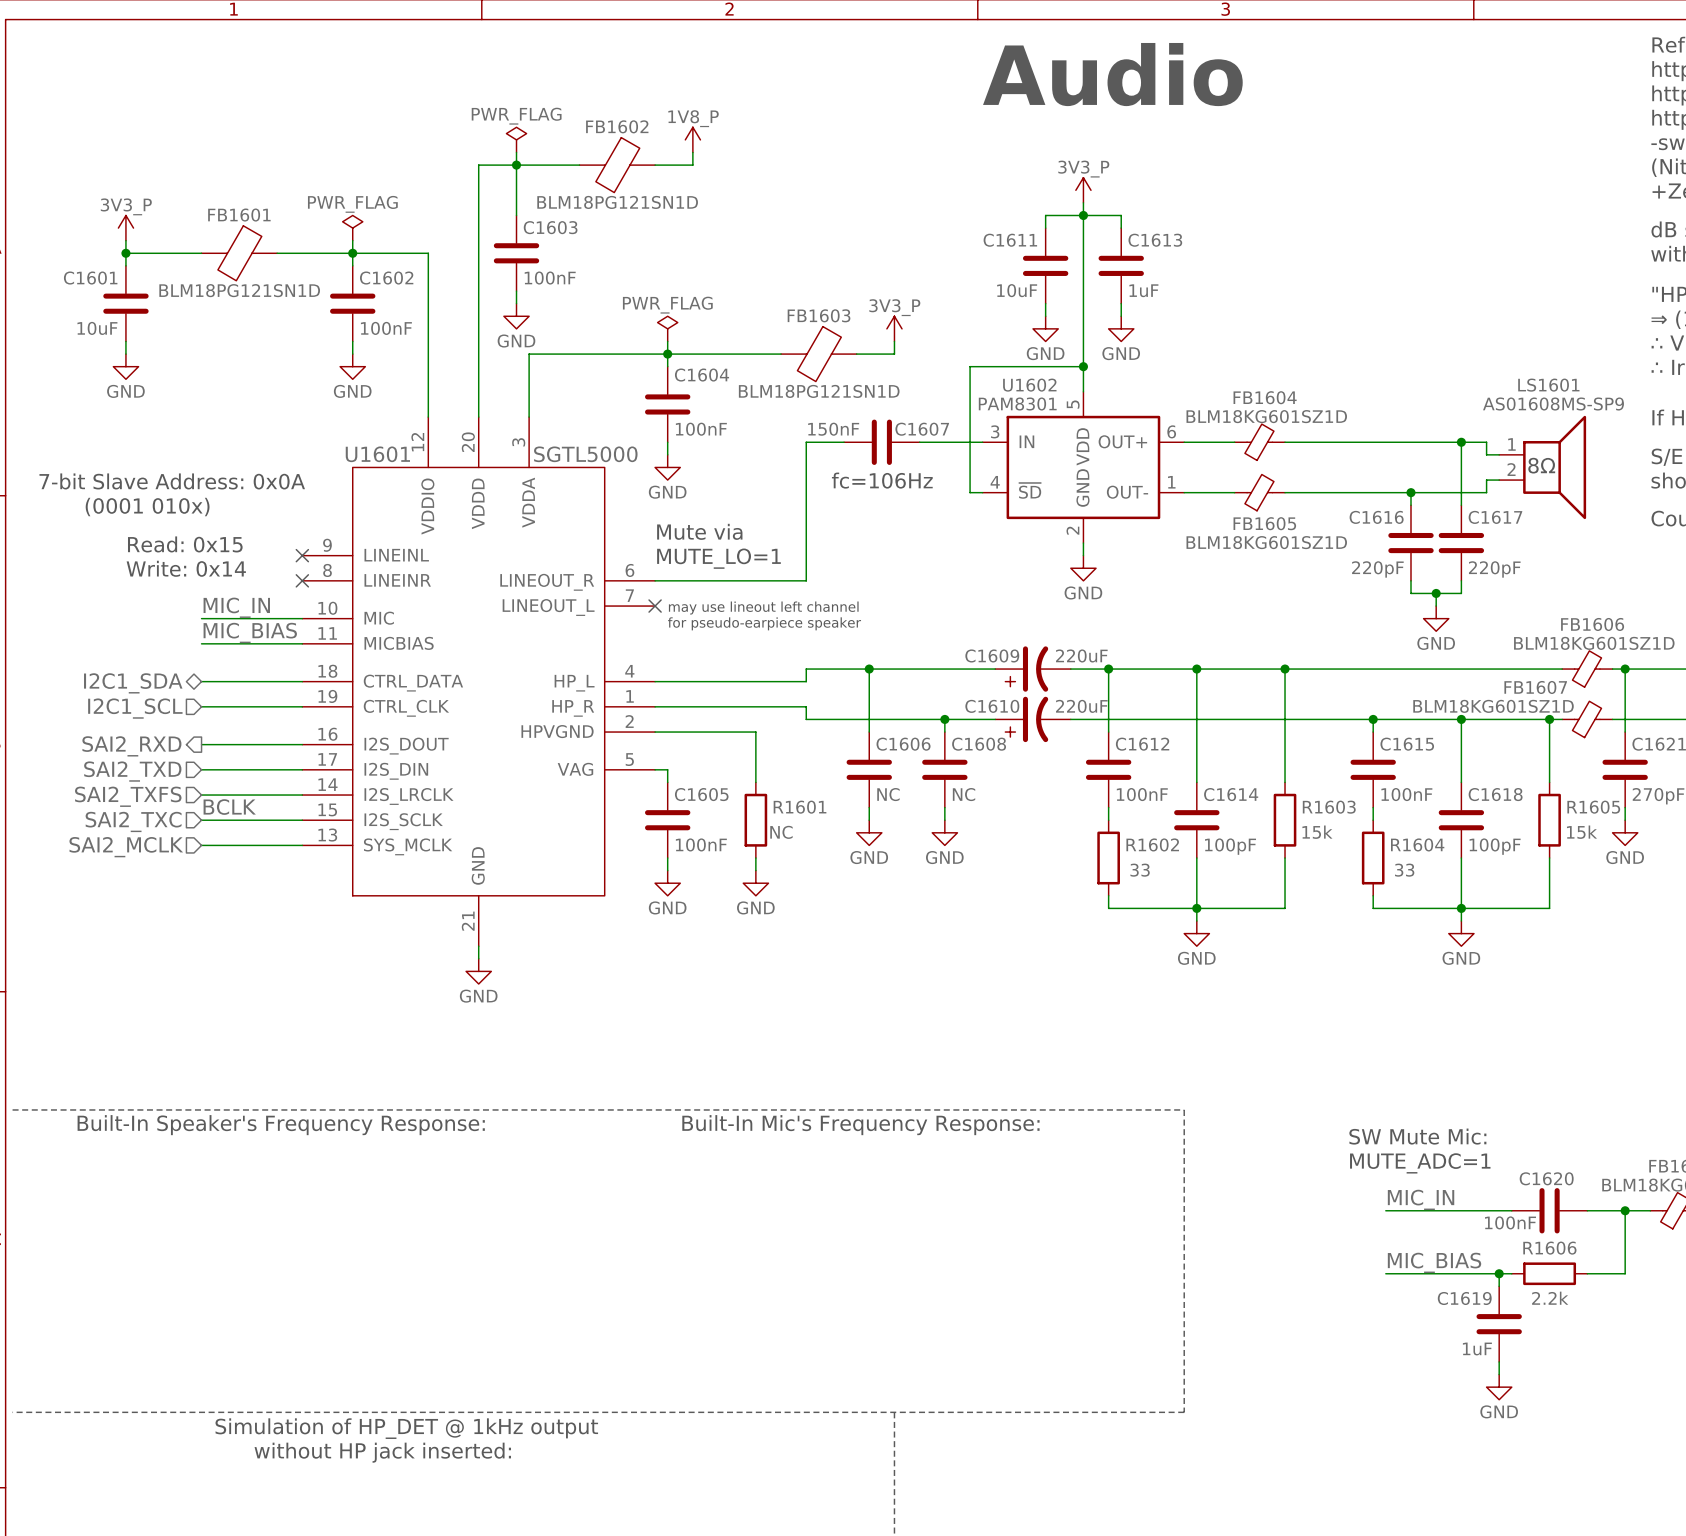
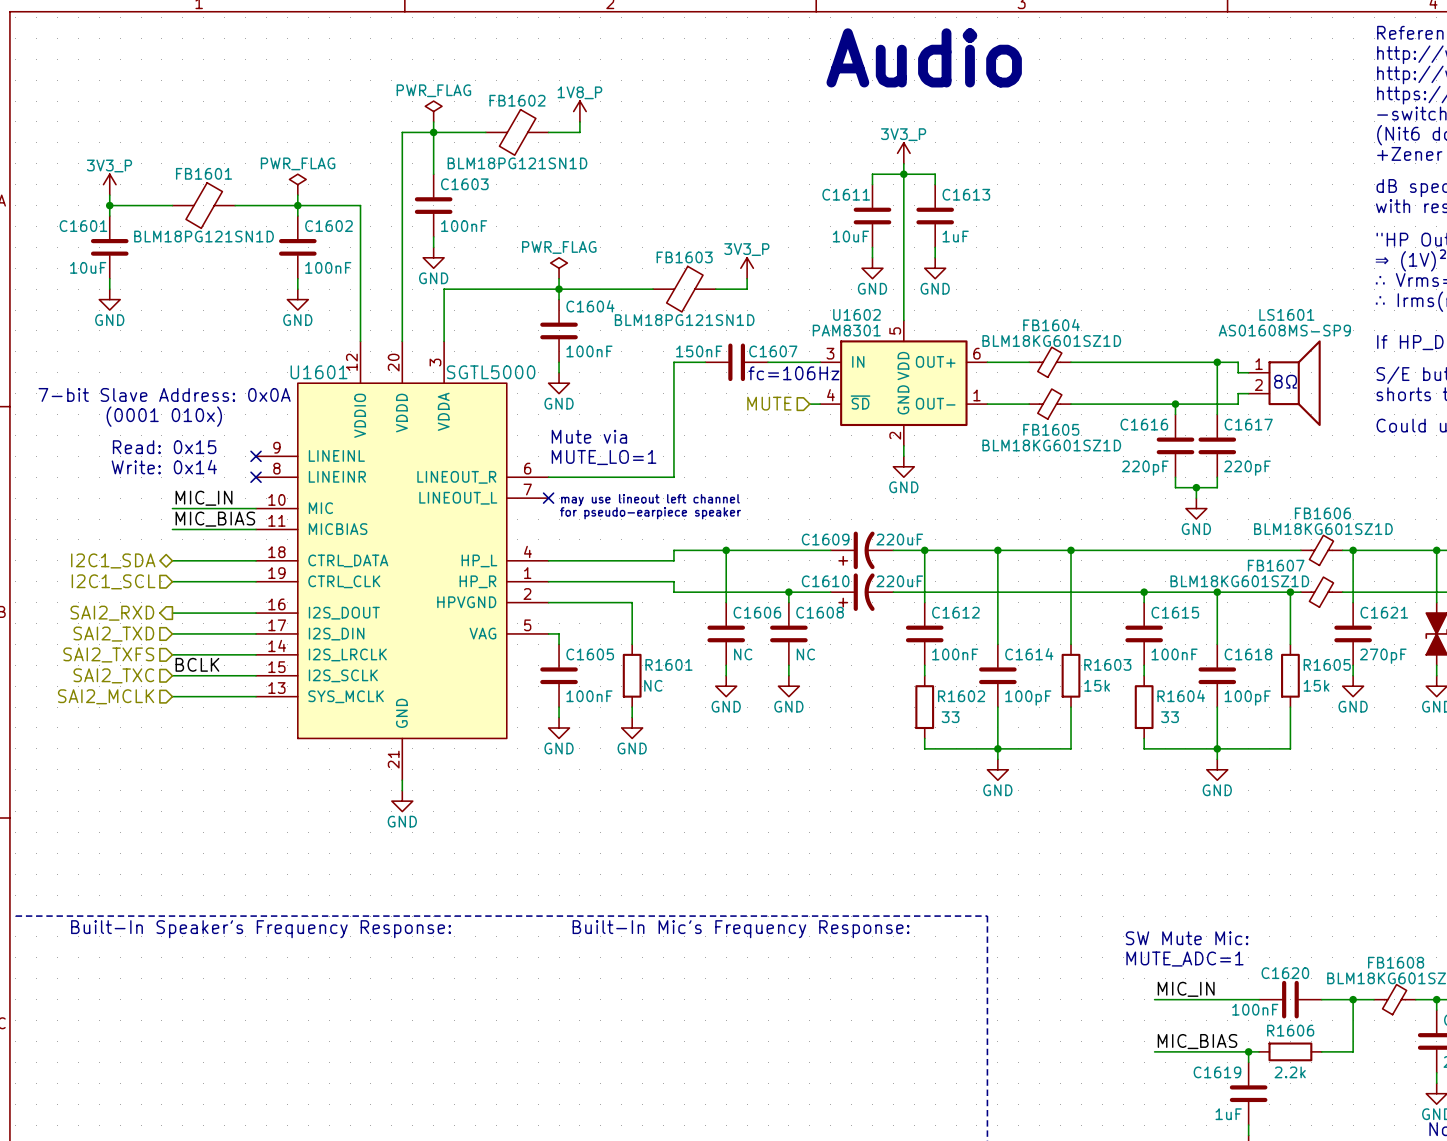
wire: (1083, 366) (970, 366) (970, 492) -> none
junction: (1083, 366) -> none
text position: fc=106Hz (882, 480) -> fc=106Hz (793, 373)
hierarchical label: none -> MUTE (769, 403)

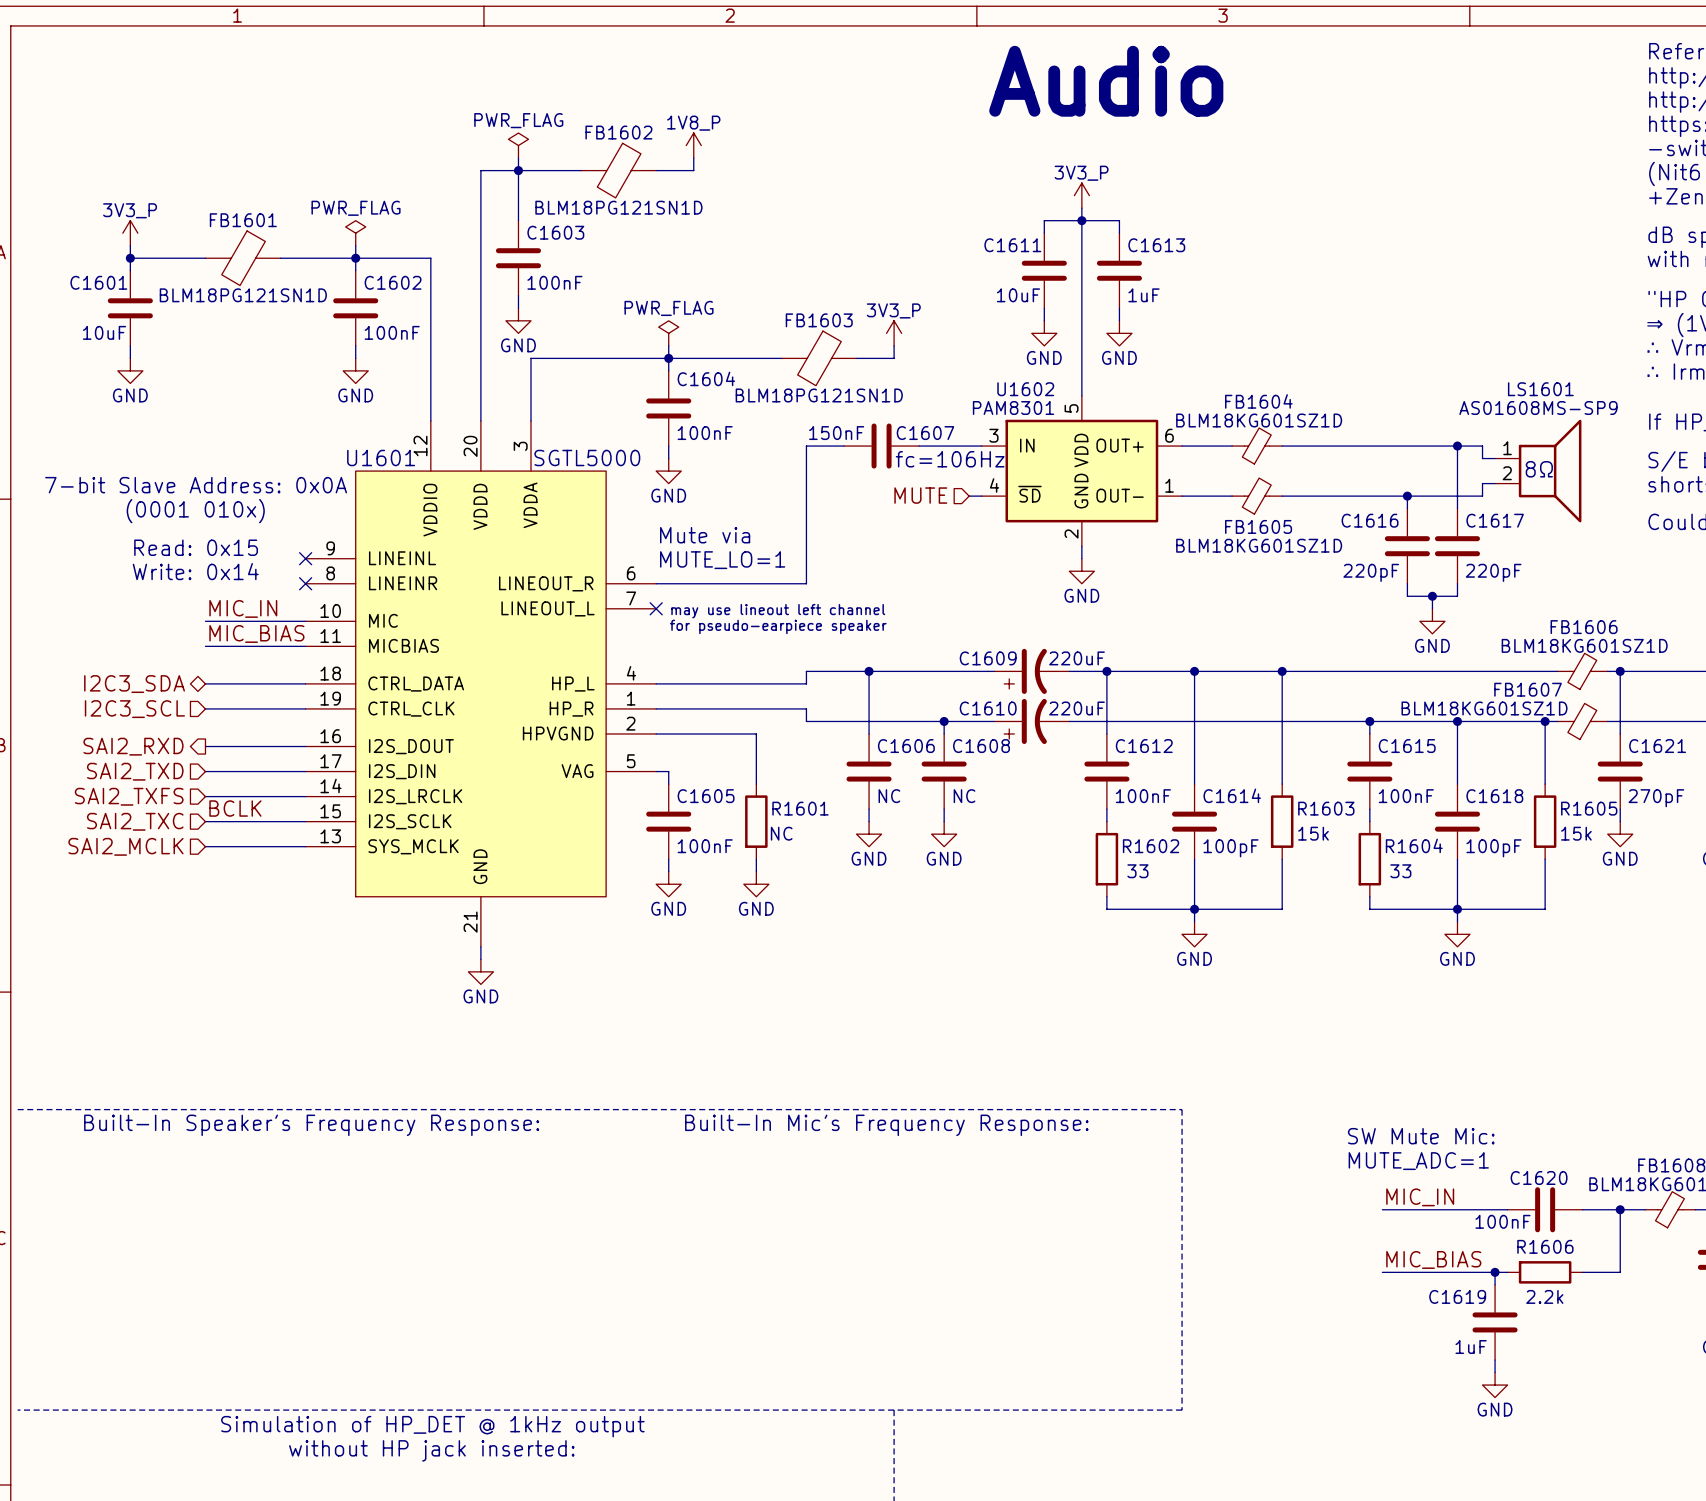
hierarchical label: I2C1_SDA (113, 560) -> I2C3_SDA (134, 684)
hierarchical label: I2C1_SCL (113, 581) -> I2C3_SCL (134, 709)

